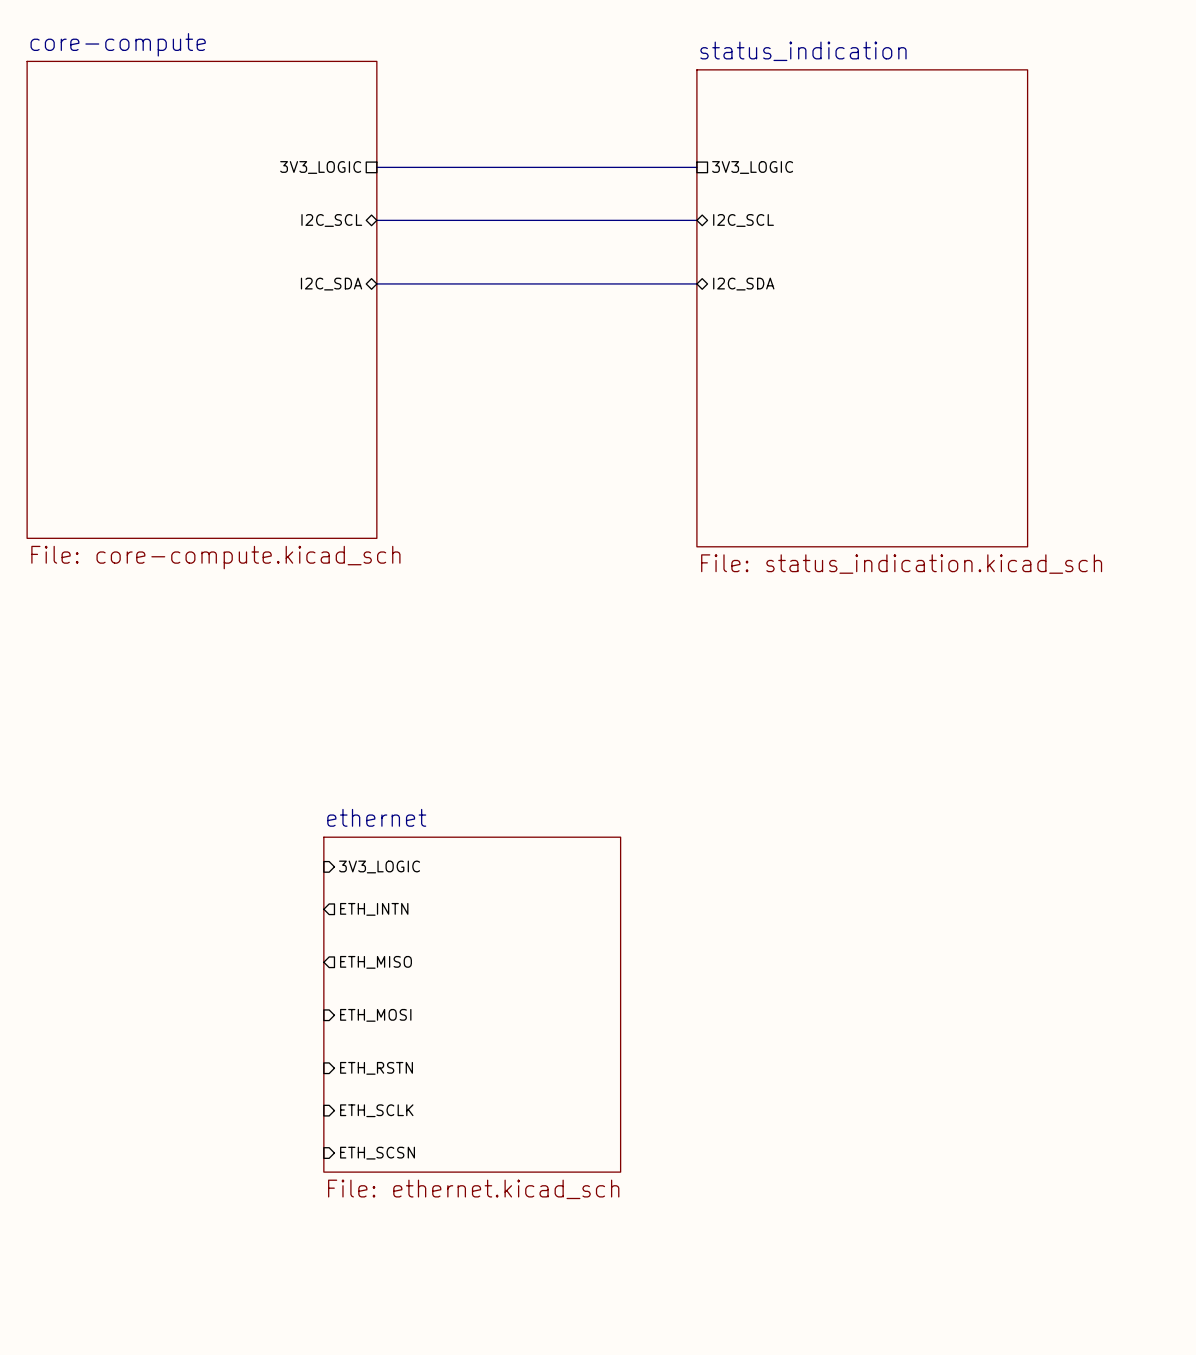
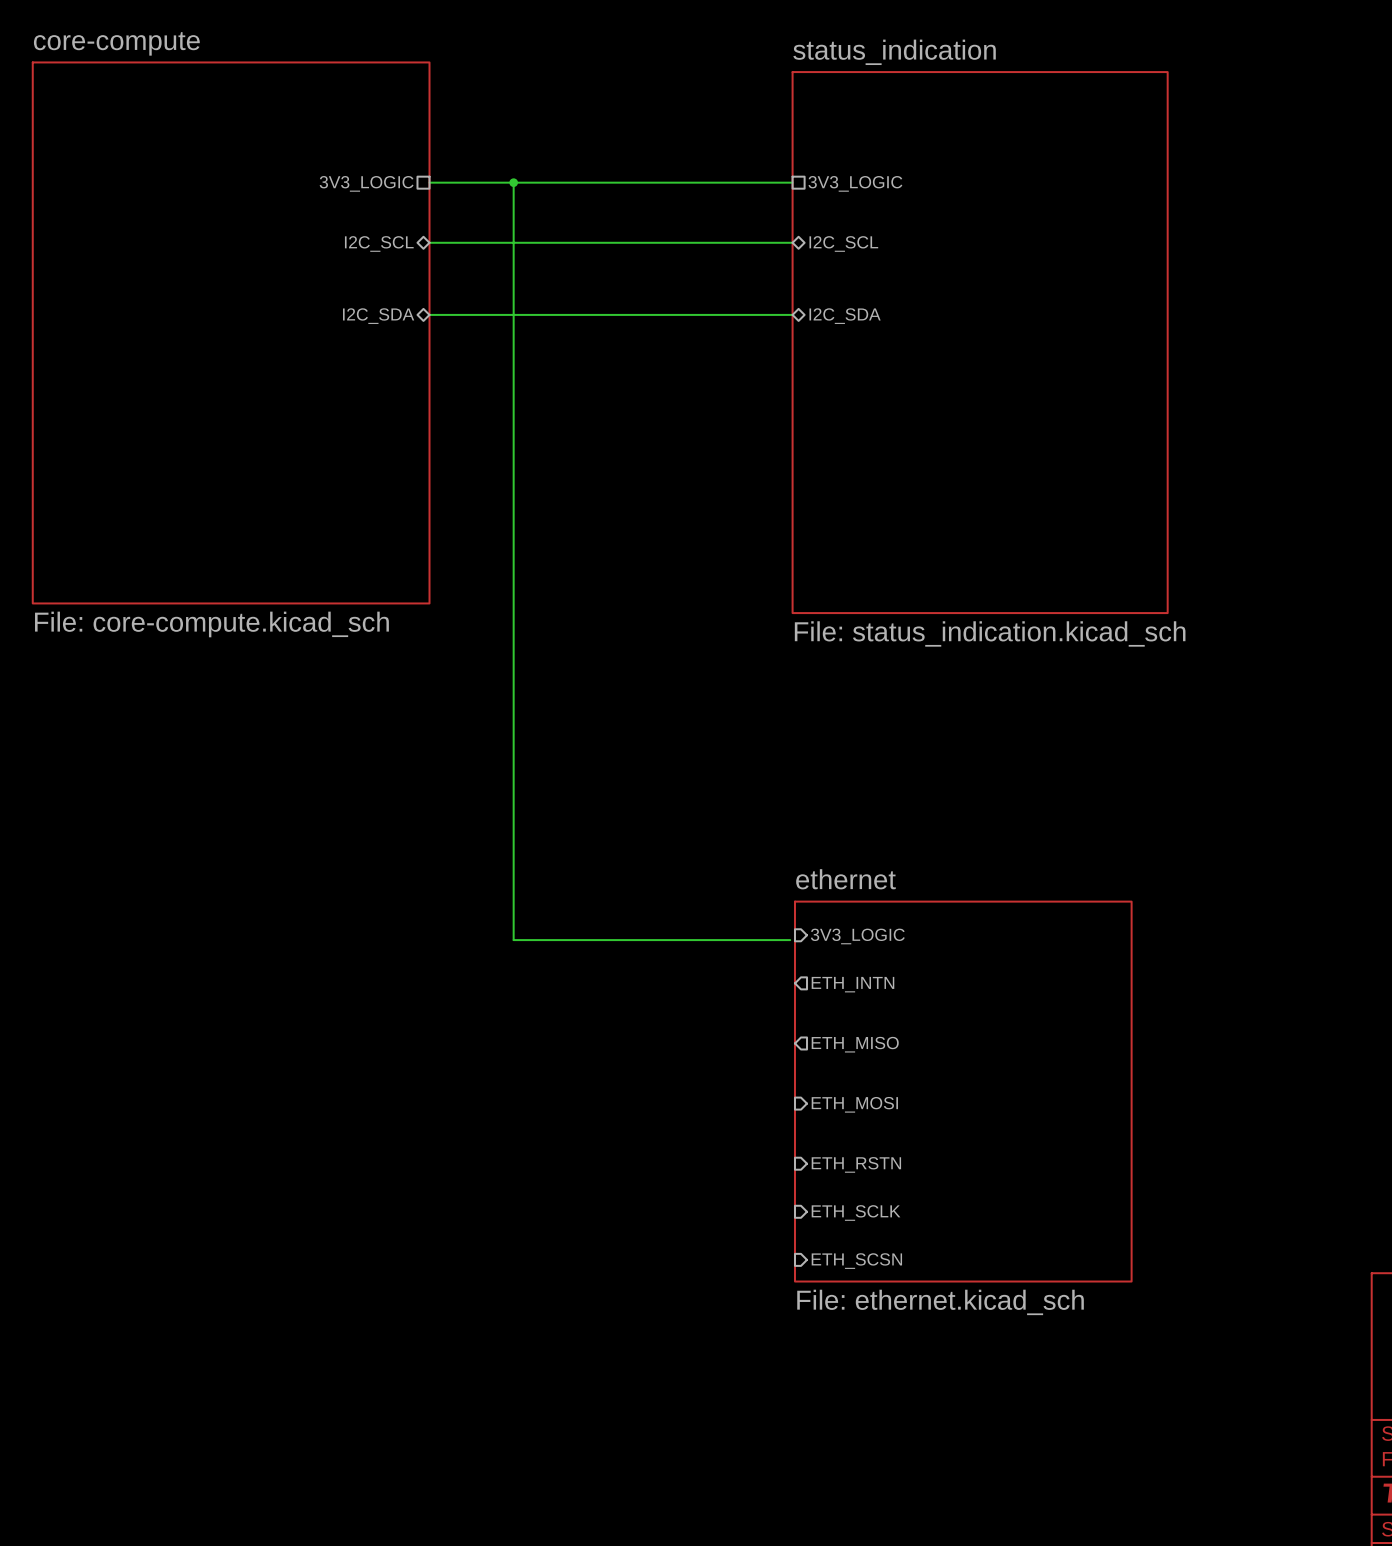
wire: none -> (513, 182) (513, 940) (790, 940)
junction: none -> (513, 182)
sheet pin: none -> 3V3_LOGIC (857, 936)
sheet pin: 3V3_LOGIC (379, 866) -> none
sheet pin: none -> ETH_INTN (852, 984)
sheet pin: ETH_INTN (374, 909) -> none
sheet pin: none -> ETH_MISO (855, 1044)
sheet pin: ETH_MISO (376, 962) -> none
sheet ethernet: none -> File: ethernet.kicad_sch (963, 1091)
sheet pin: none -> ETH_MOSI (854, 1104)
sheet ethernet: File: ethernet.kicad_sch (472, 1004) -> none
sheet pin: ETH_MOSI (375, 1015) -> none
sheet pin: none -> ETH_RSTN (856, 1164)
sheet pin: ETH_RSTN (376, 1068) -> none
sheet pin: none -> ETH_SCLK (856, 1212)
sheet pin: ETH_SCLK (376, 1110) -> none
sheet pin: none -> ETH_SCSN (856, 1261)
sheet pin: ETH_SCSN (377, 1153) -> none

